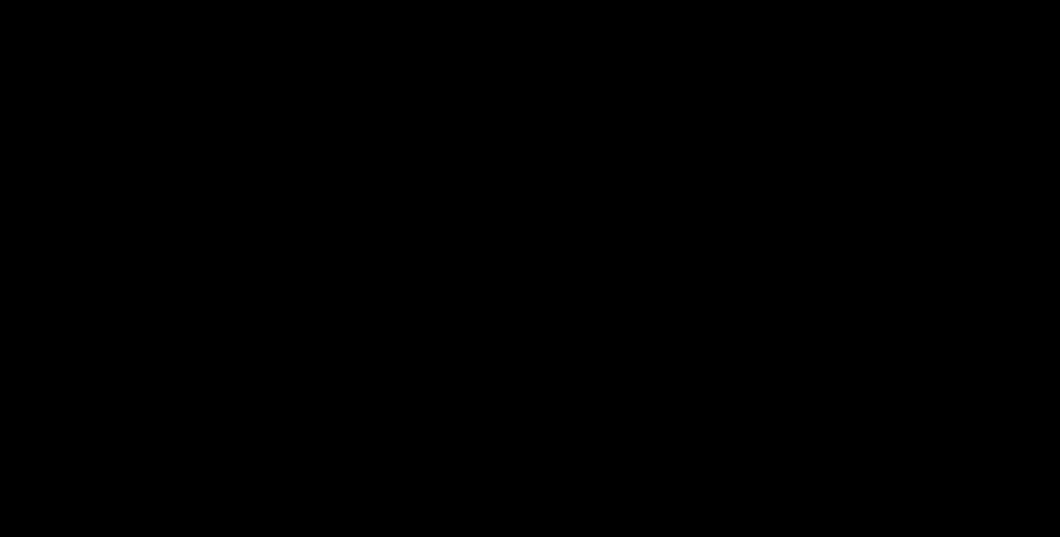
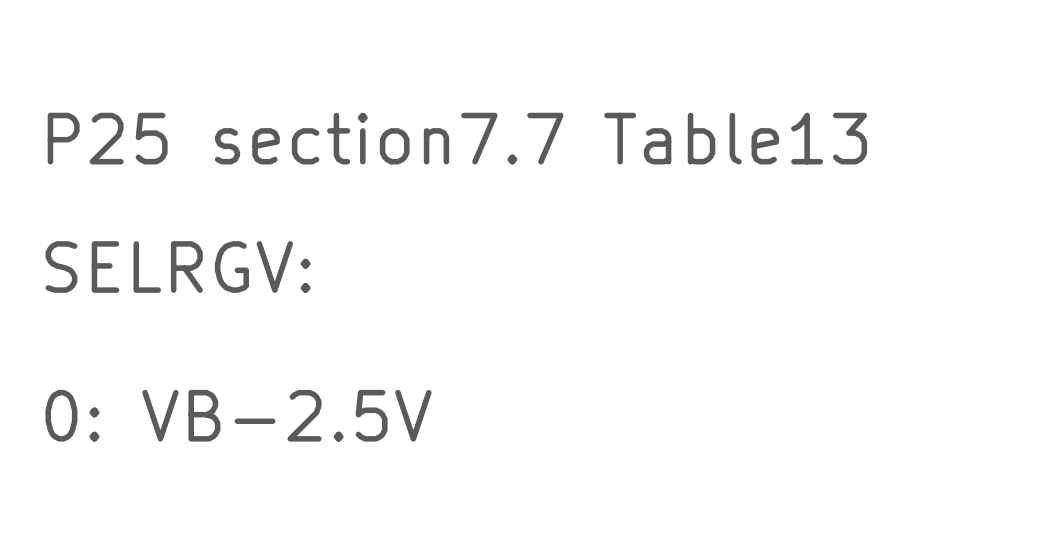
text: none -> P25 section7.7 Table13 (457, 138)
text: none -> SELRGV: (178, 267)
text: none -> 0: VB-2.5V (238, 415)

